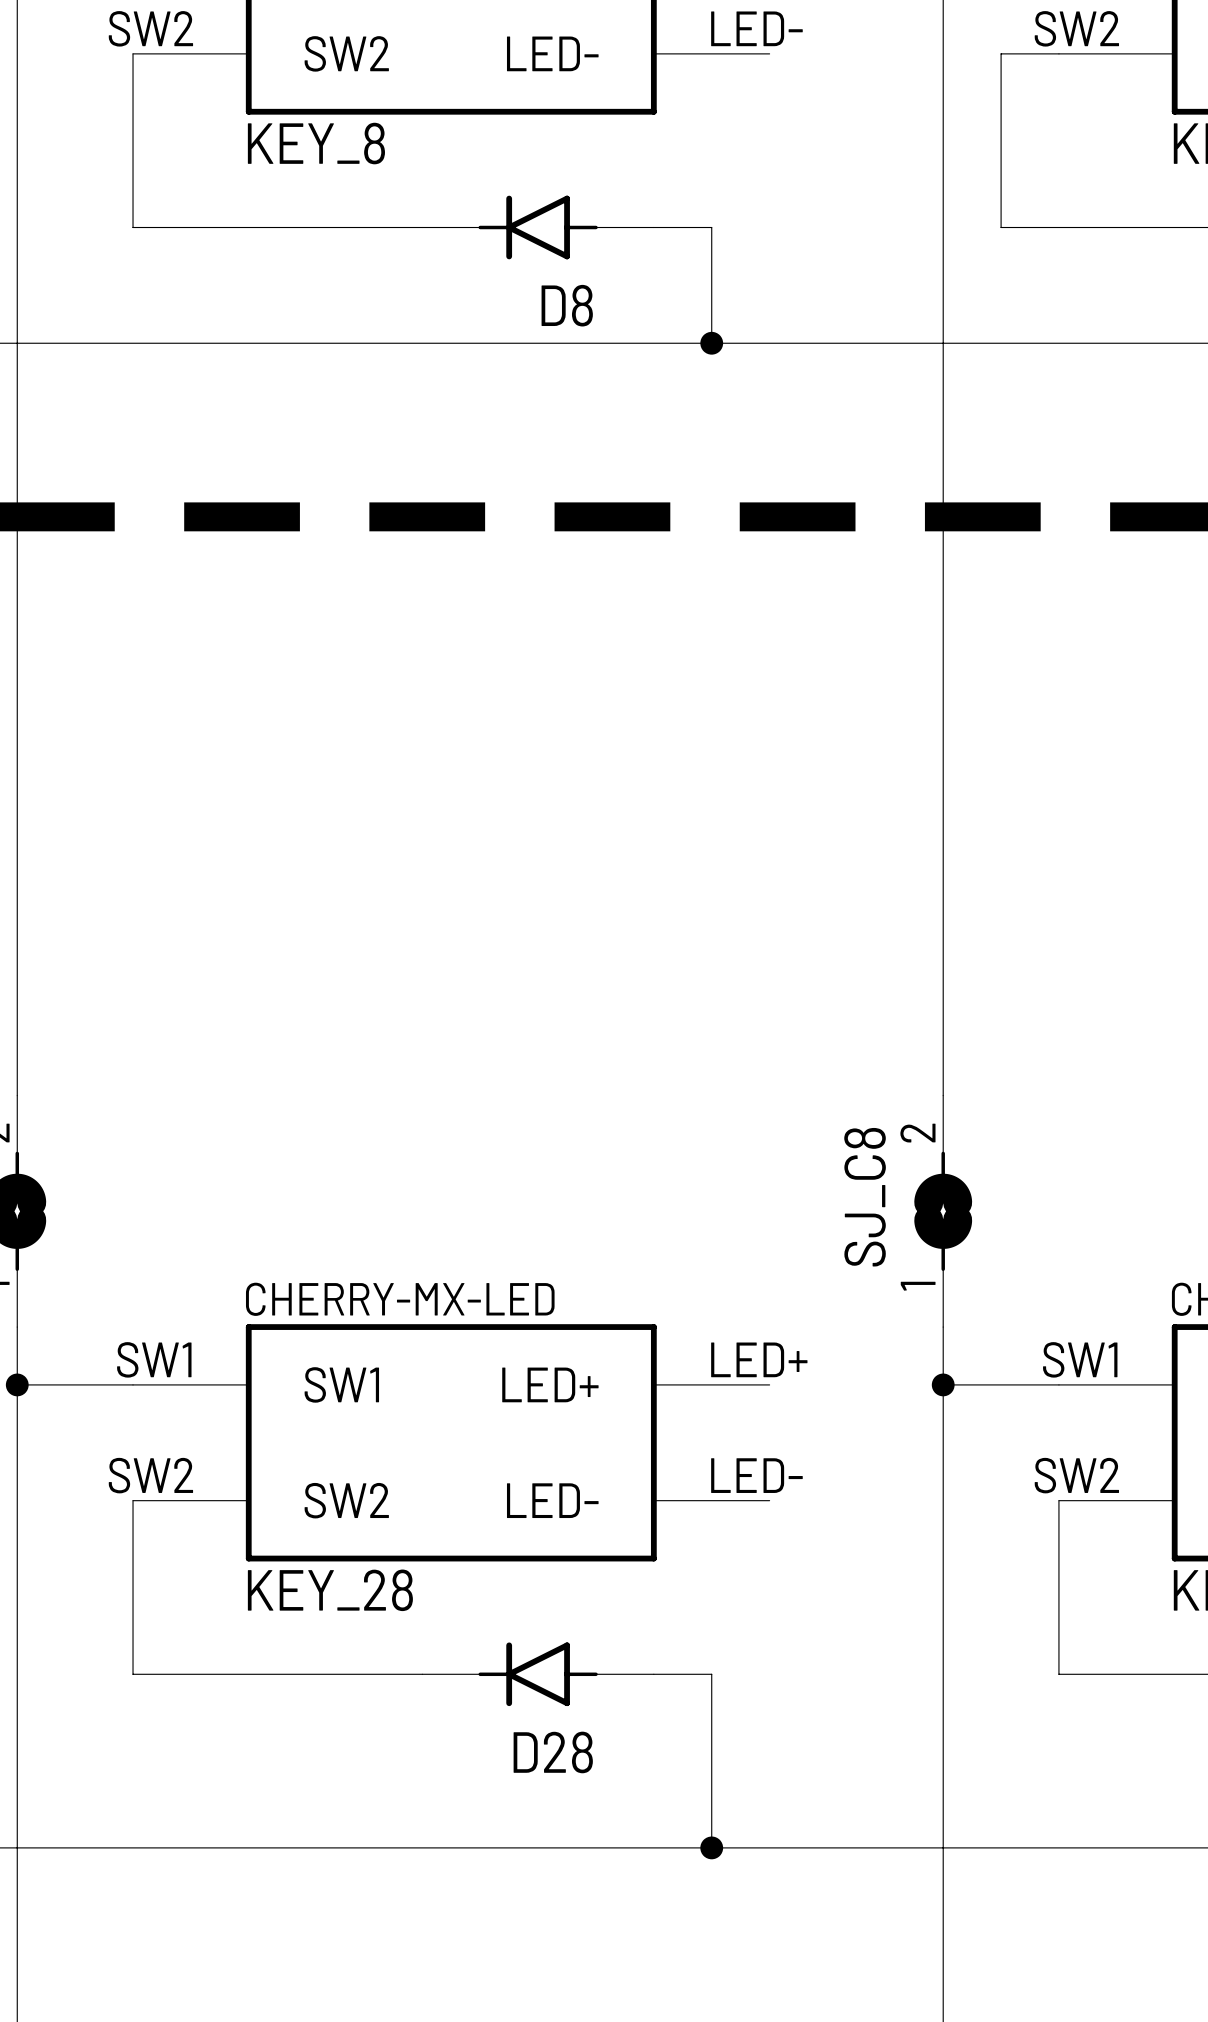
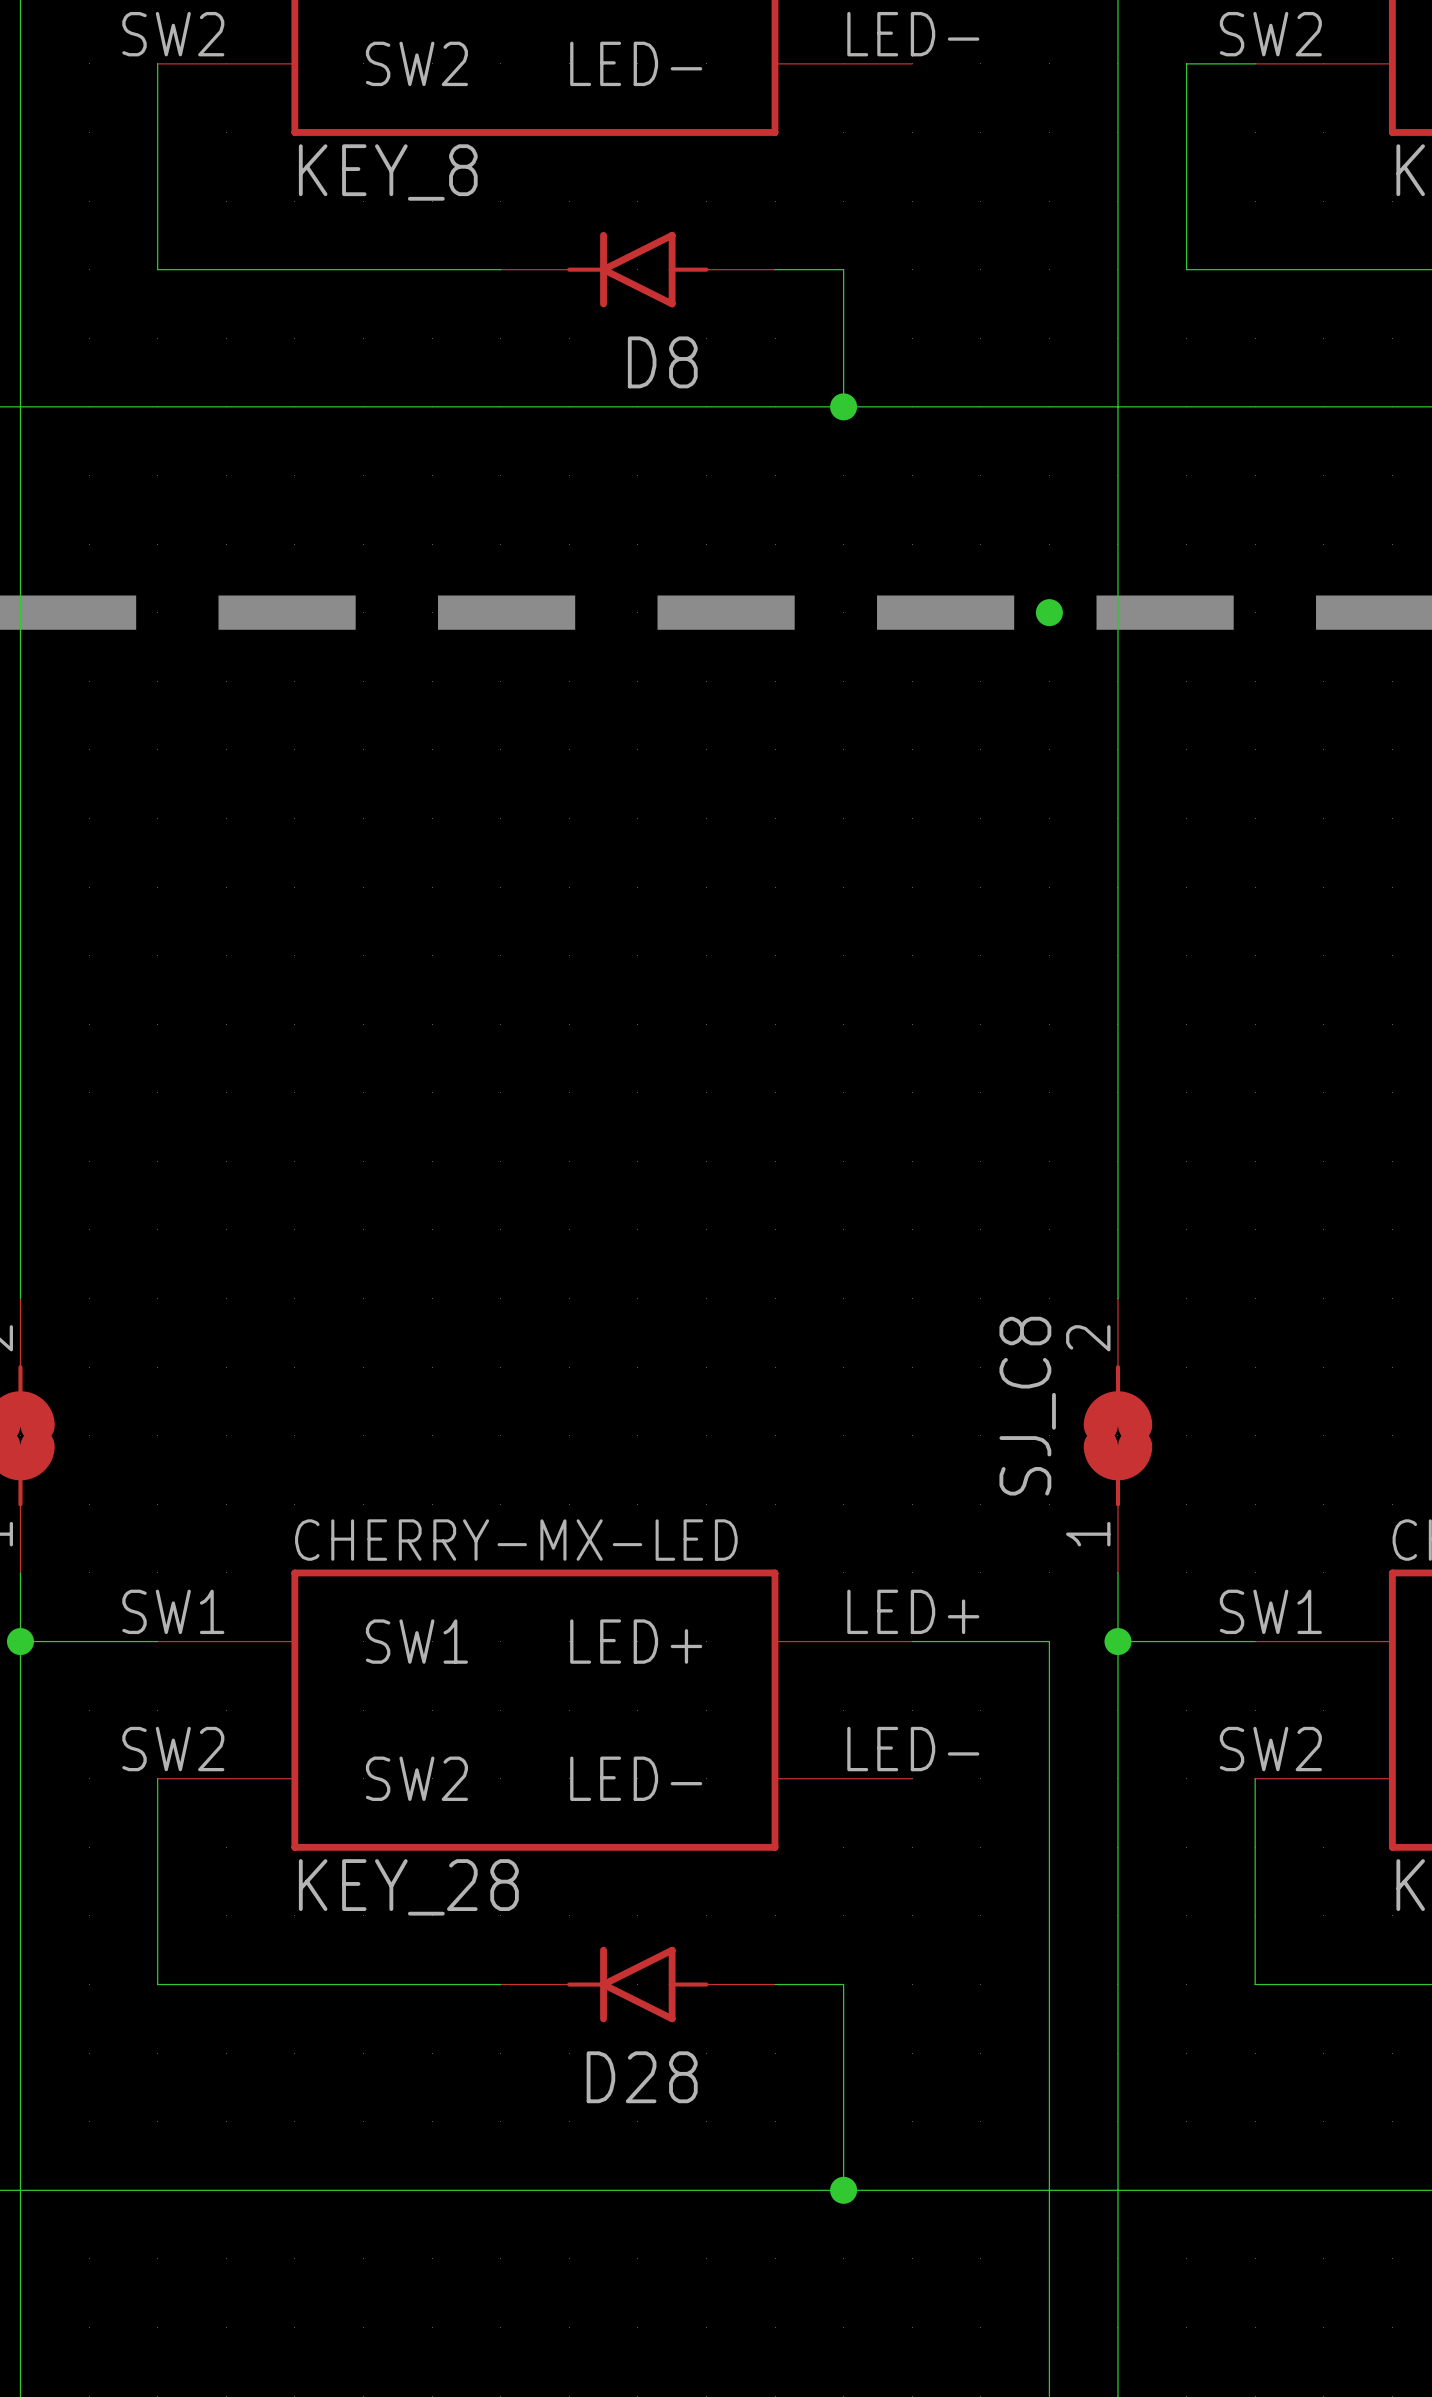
junction: none -> (1049, 612)
wire: none -> (912, 1641) (1049, 1641) (1049, 2396)

